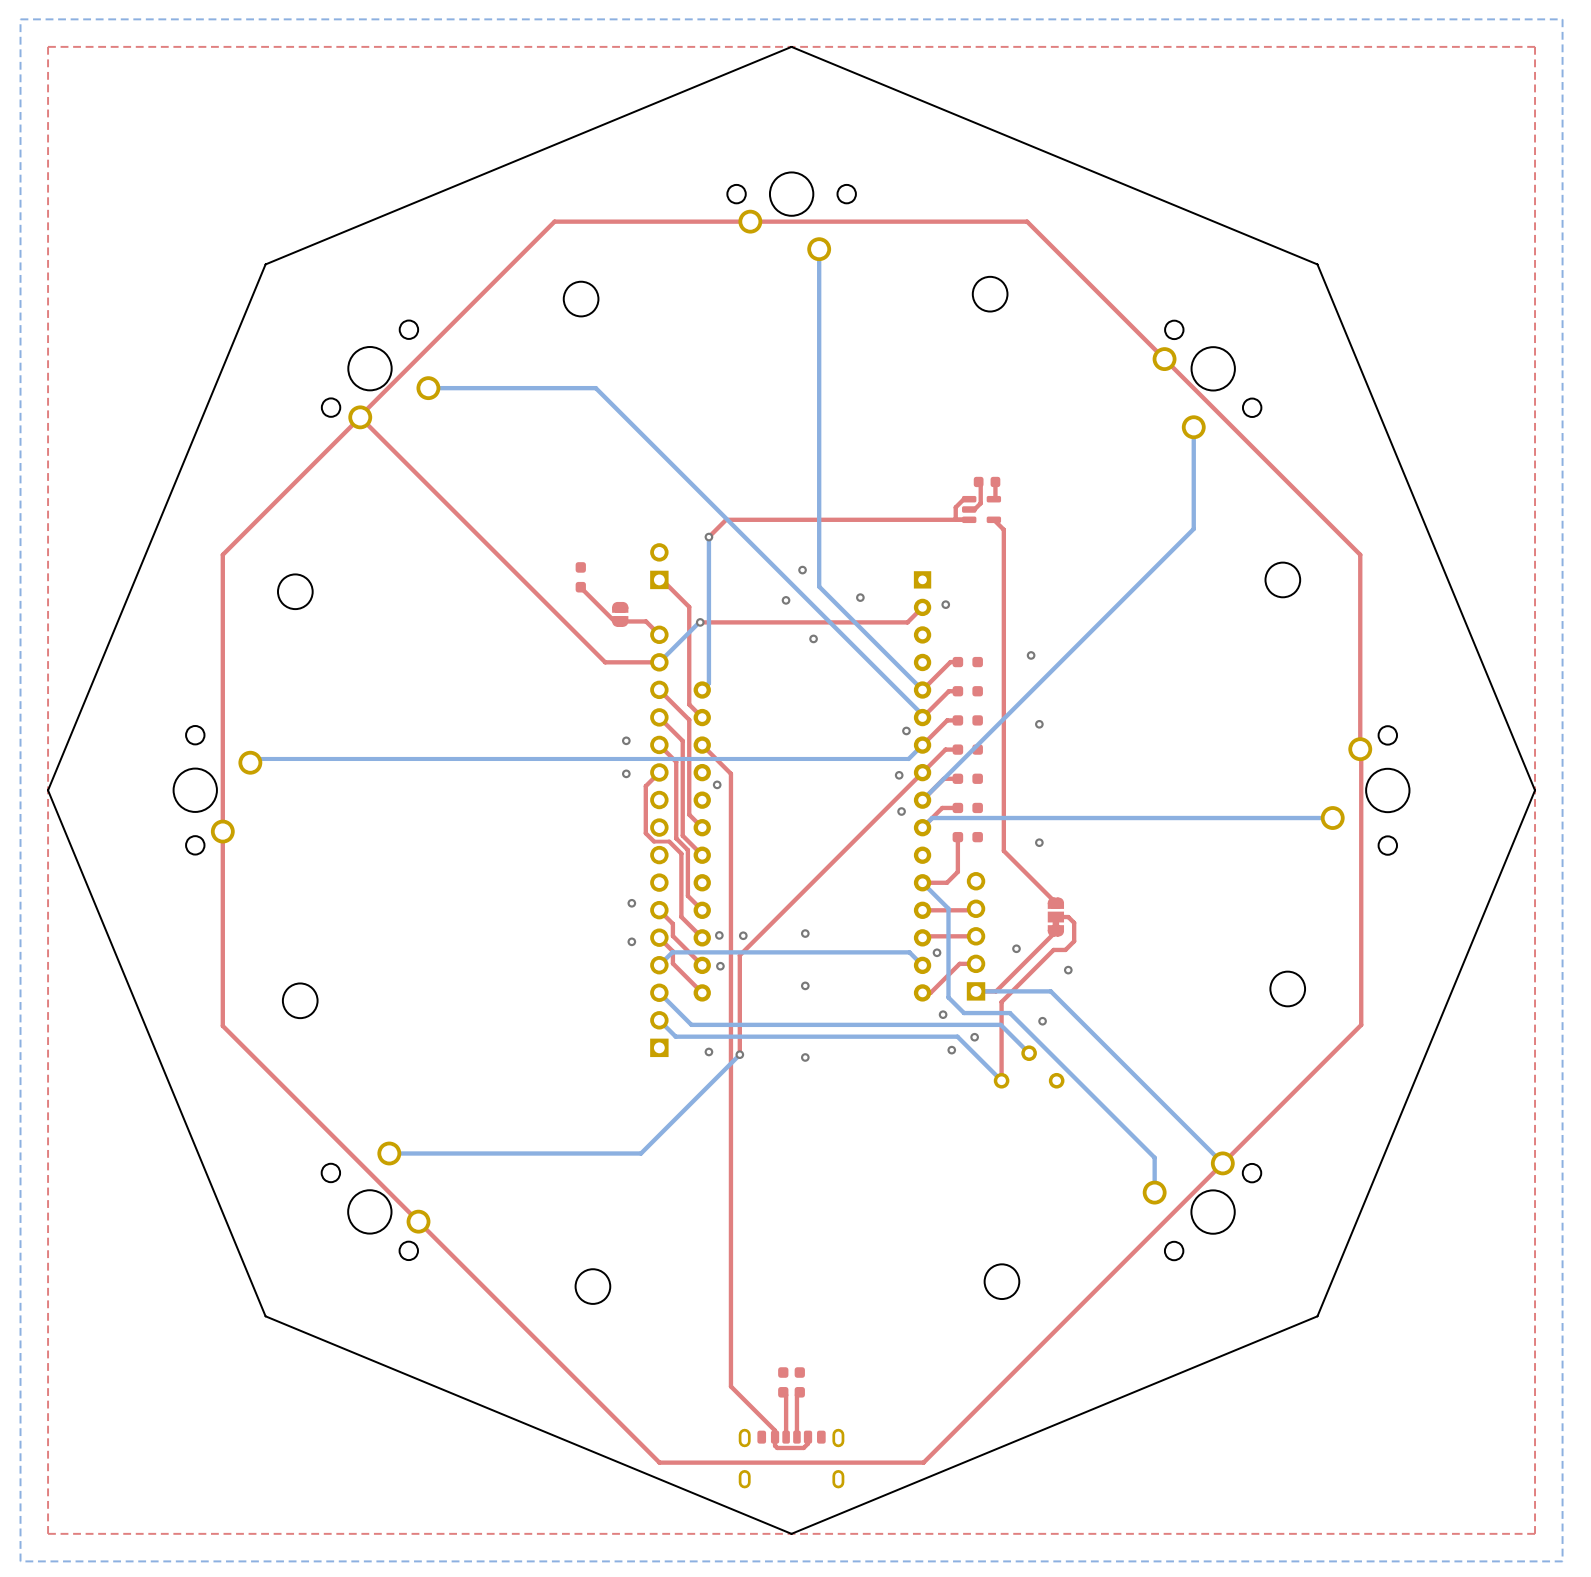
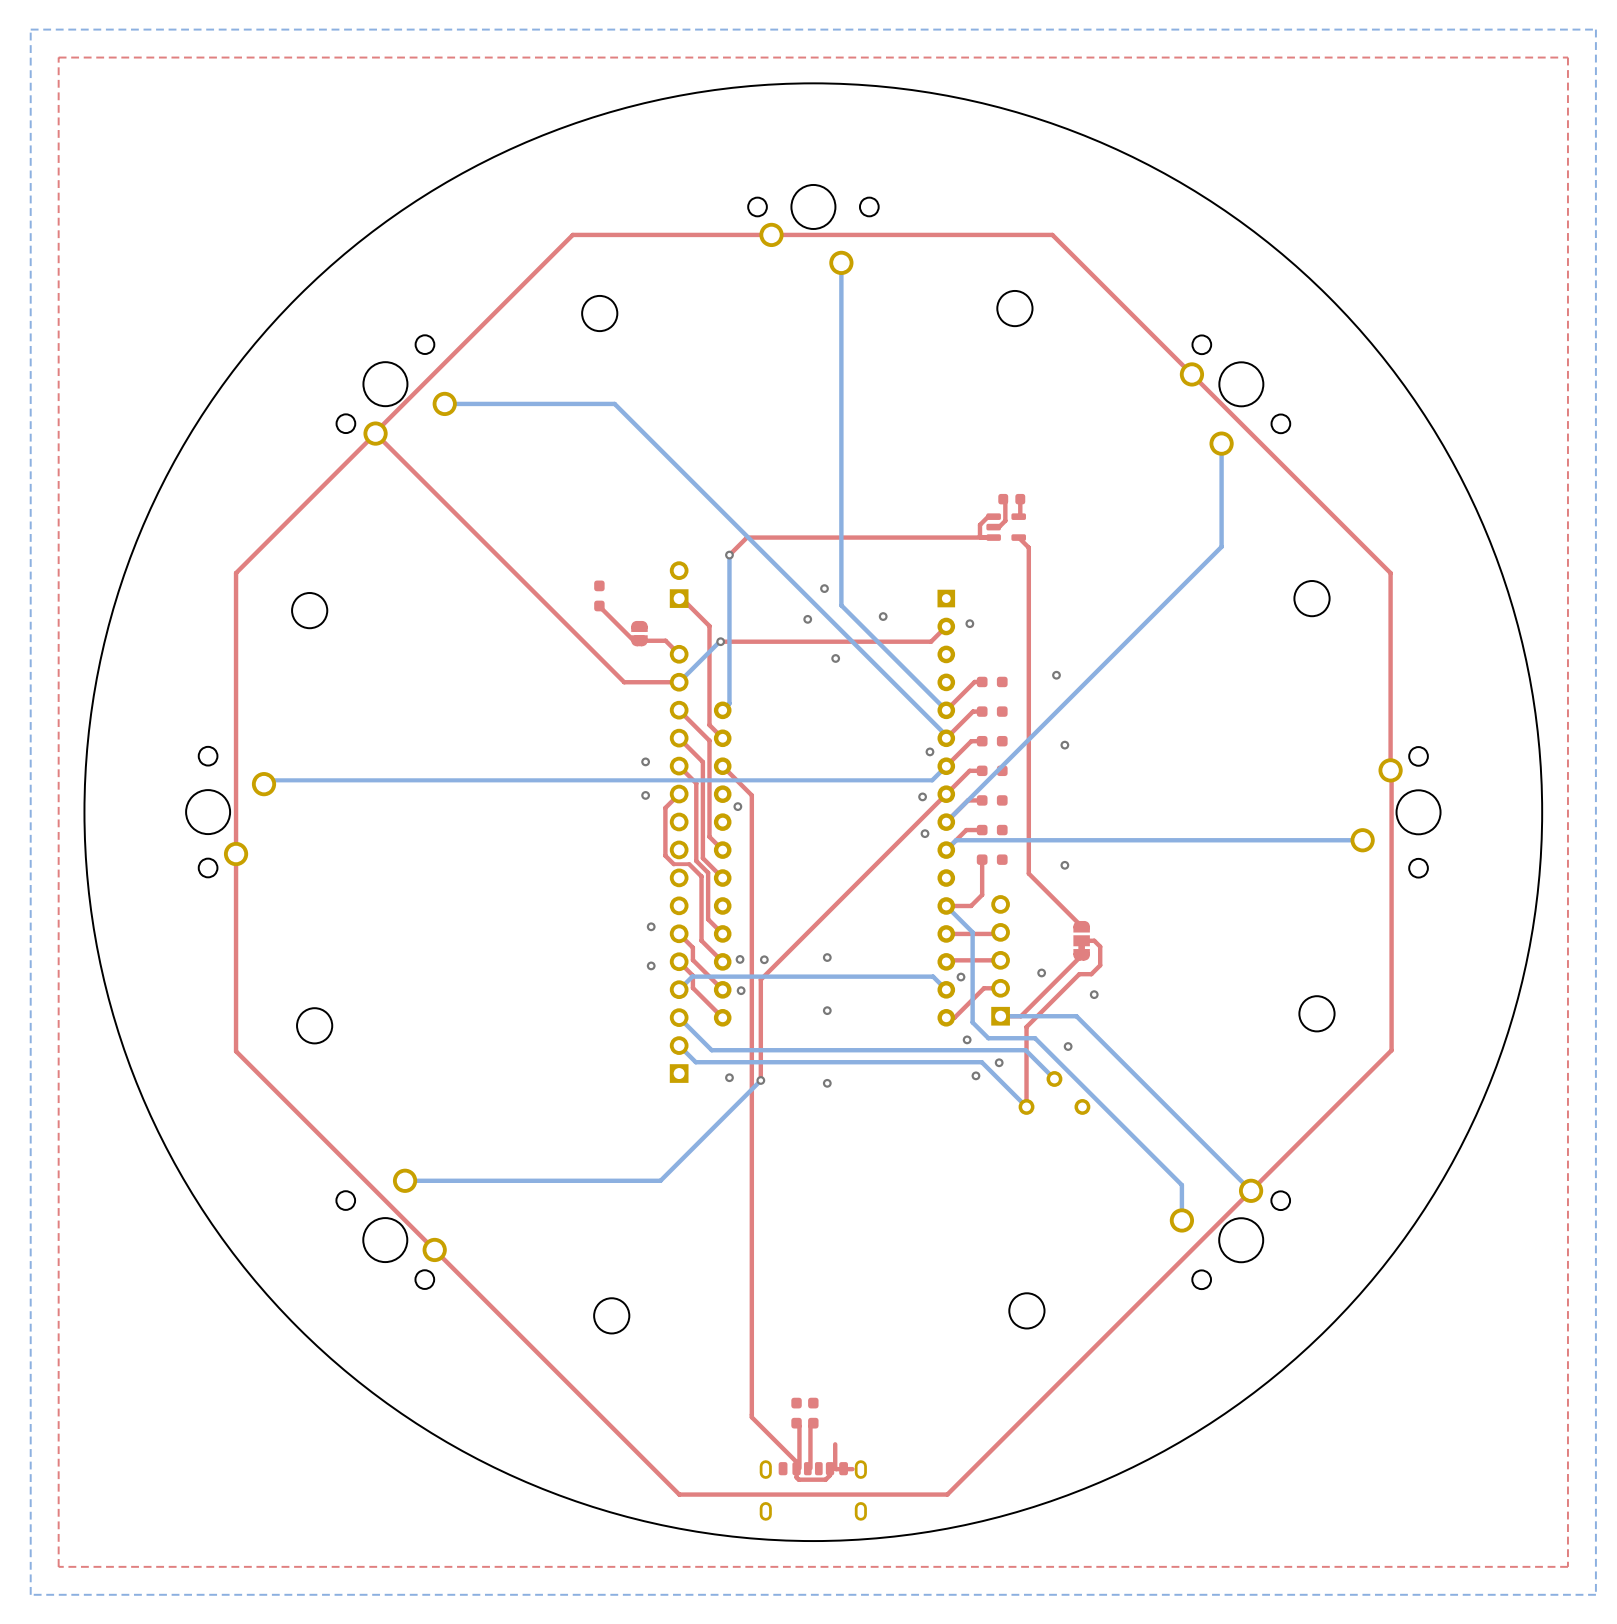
board edge: (791, 46) (1317, 264) (1535, 790) (1317, 1316) (791, 1533) (265, 1316) (48, 790) (265, 264) (791, 46) -> none
round board edge: none -> [83, 82, 1543, 1542]
part: none -> (796, 1413)
part: (783, 1382) -> none
part: none -> (813, 1413)
part: (799, 1382) -> none
top track: none -> (796, 1423) (799, 1426) (799, 1468)
top track: (783, 1392) (786, 1395) (786, 1437) -> none
top track: none -> (813, 1423) (810, 1426) (810, 1468)
top track: (799, 1392) (796, 1395) (796, 1437) -> none
top track: none -> (835, 1444) (835, 1468) (852, 1469)

